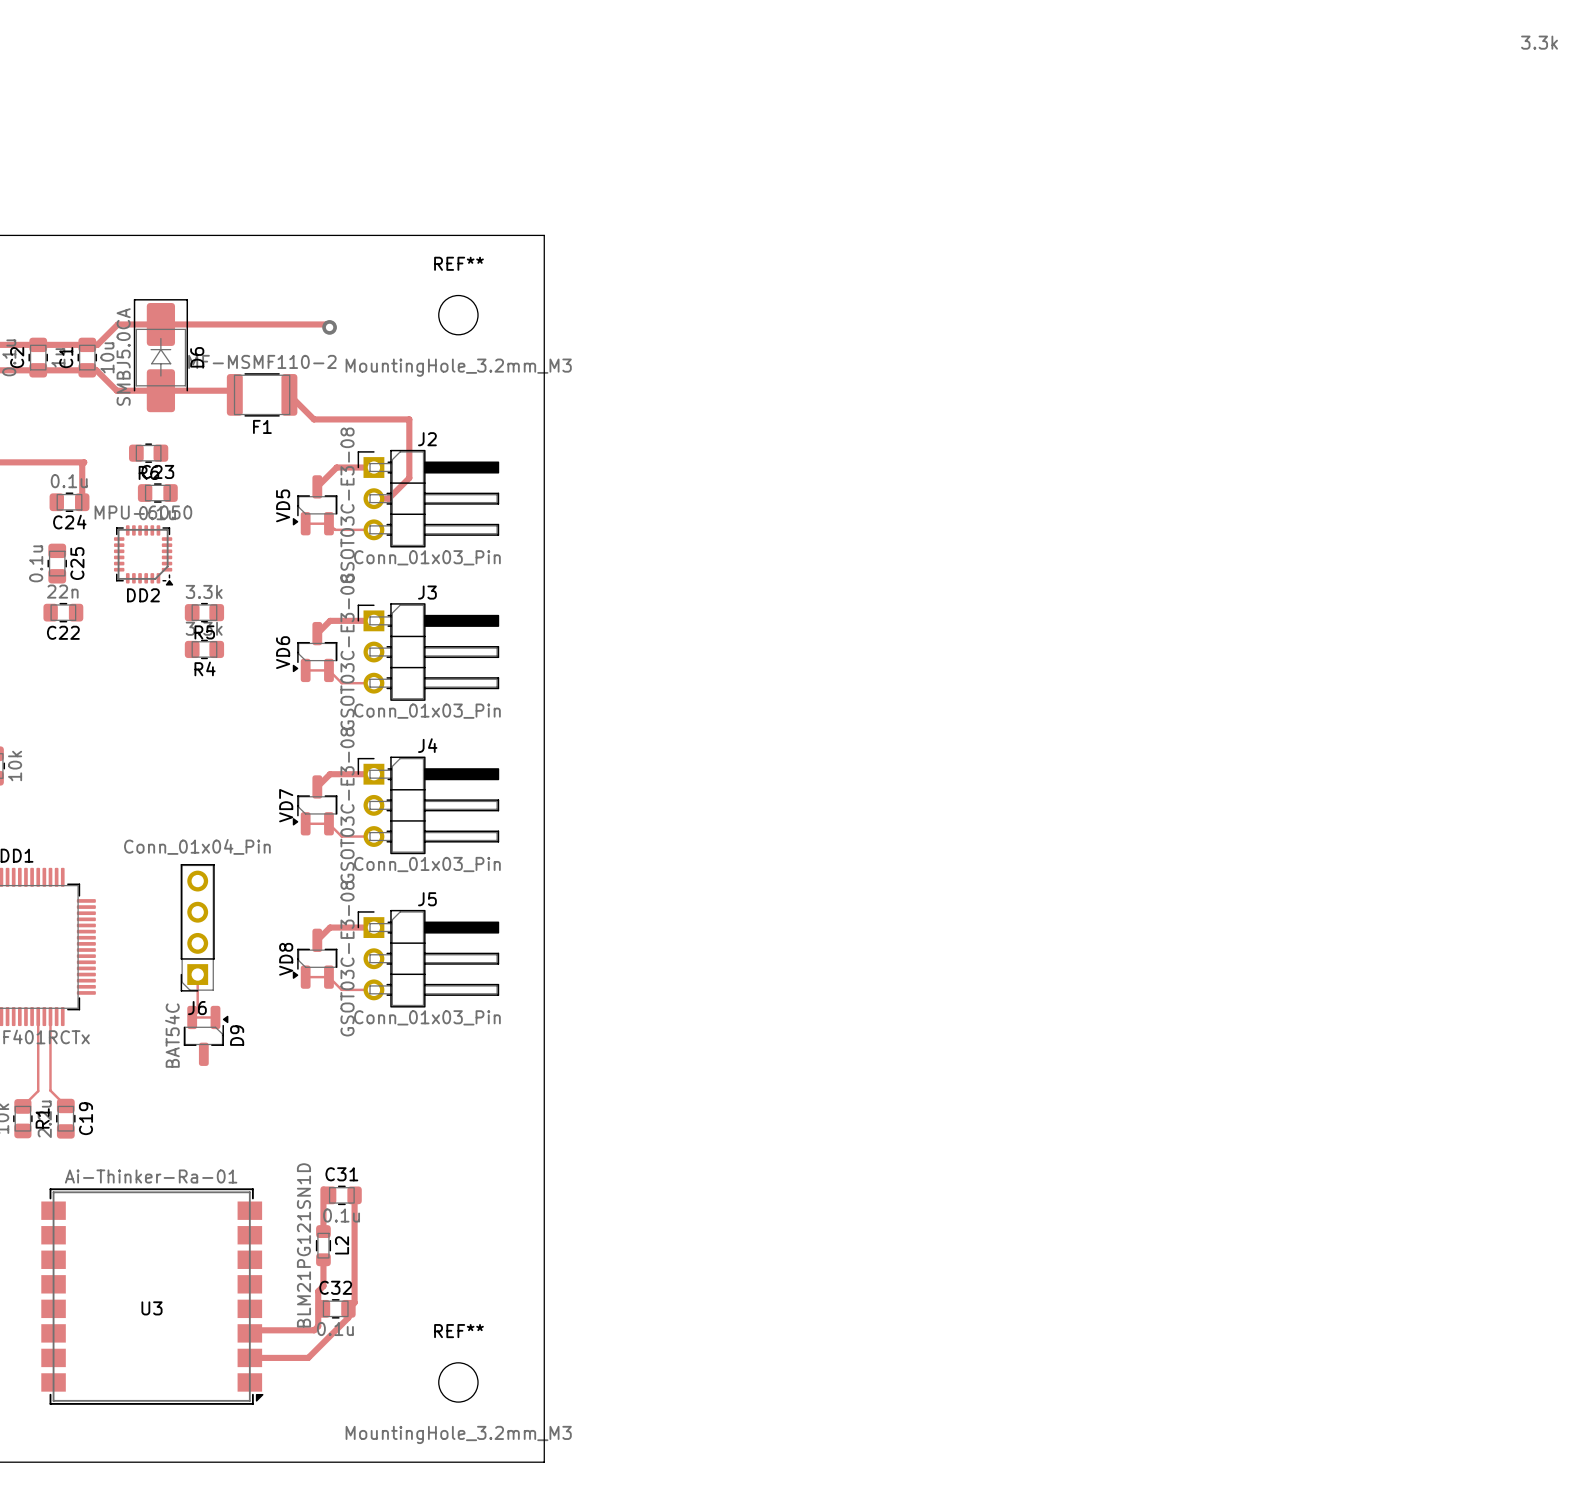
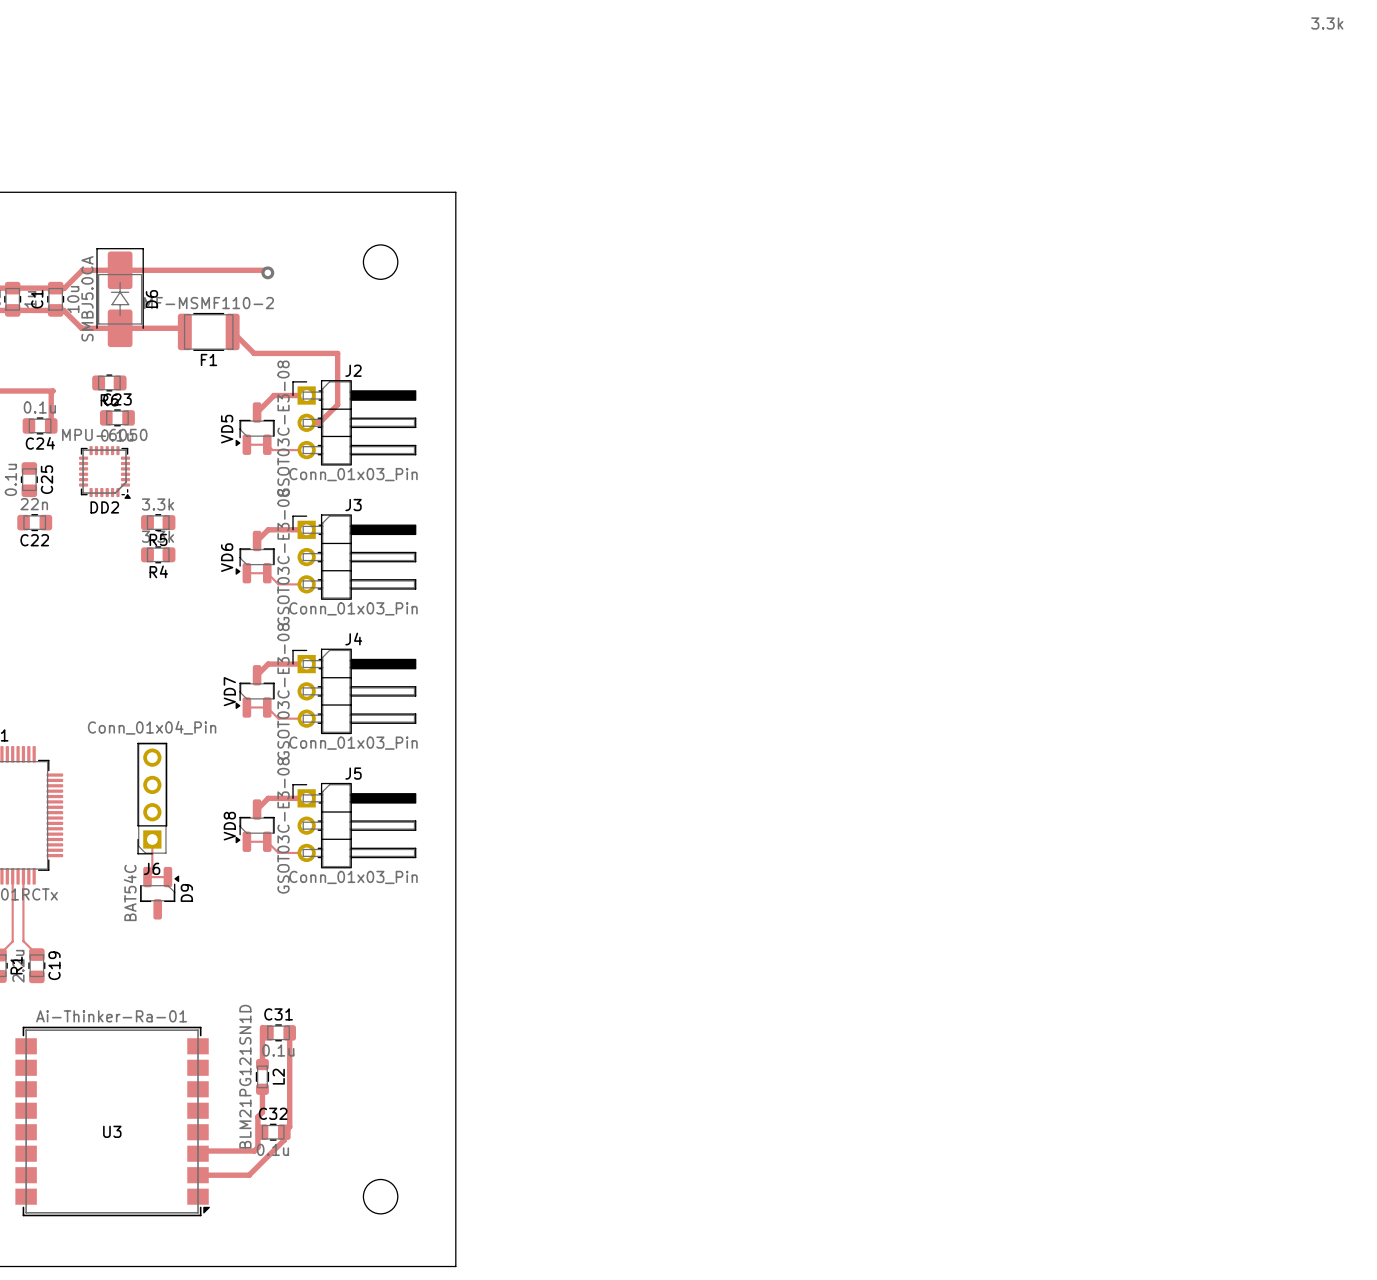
REF** name: REF** (458, 263) -> none
REF** value: MountingHole_3.2mm_M3 (458, 367) -> none
REF** name: REF** (458, 1331) -> none
REF** value: MountingHole_3.2mm_M3 (458, 1434) -> none

